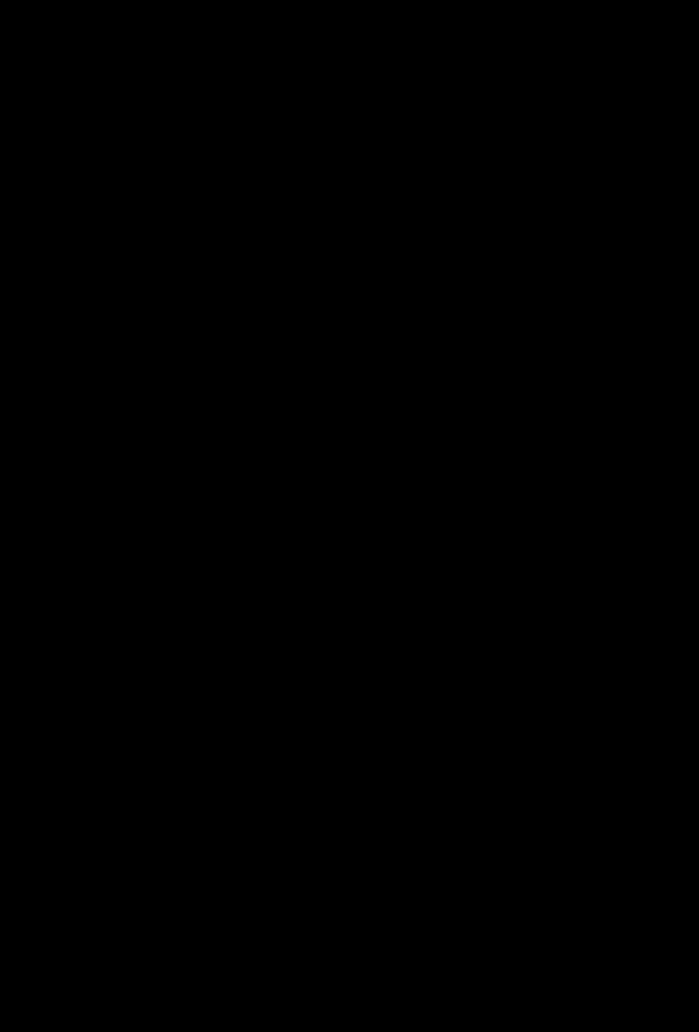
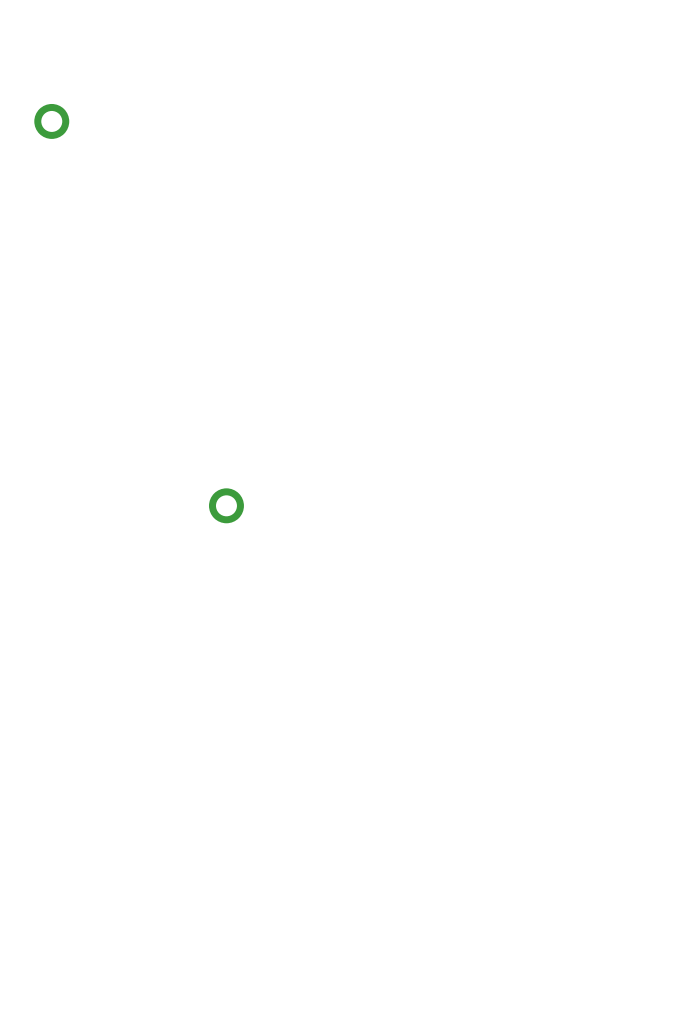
via: none -> (51, 121)
via: none -> (226, 505)

